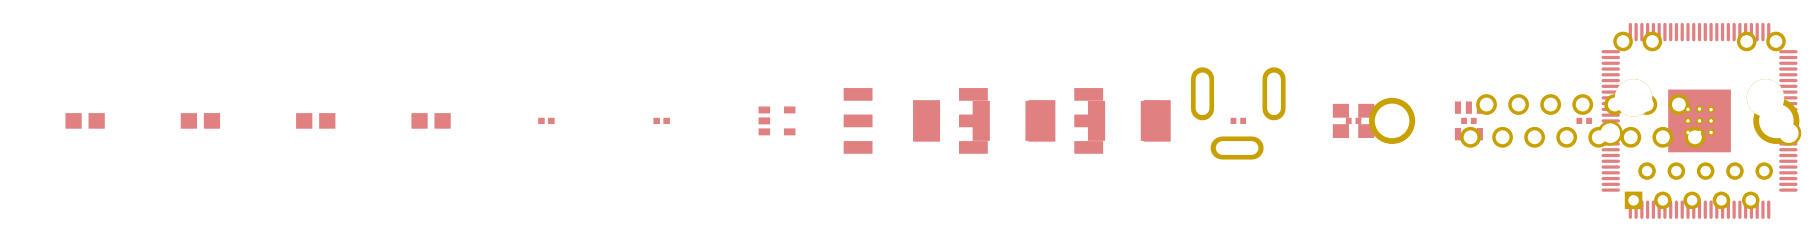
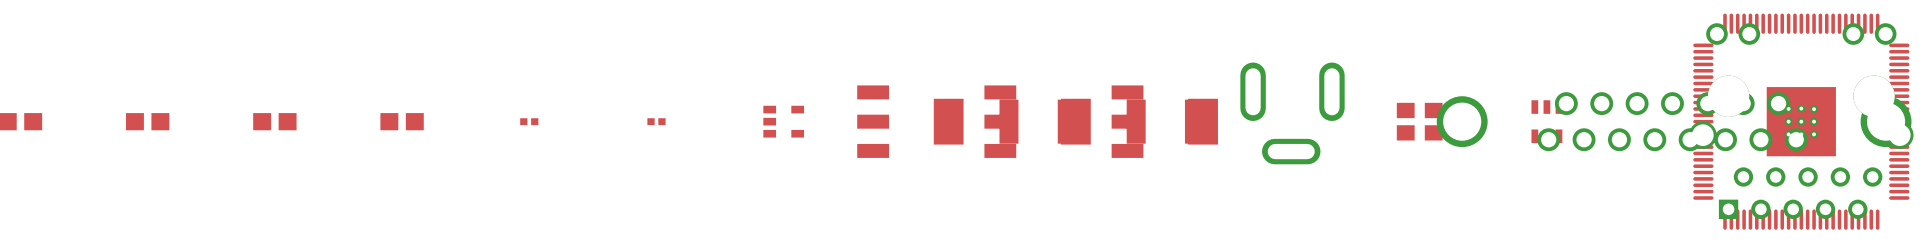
part: (1238, 120) -> none
part: (1353, 120) -> none
part: (1468, 120) -> none
part: (1584, 120) -> none

